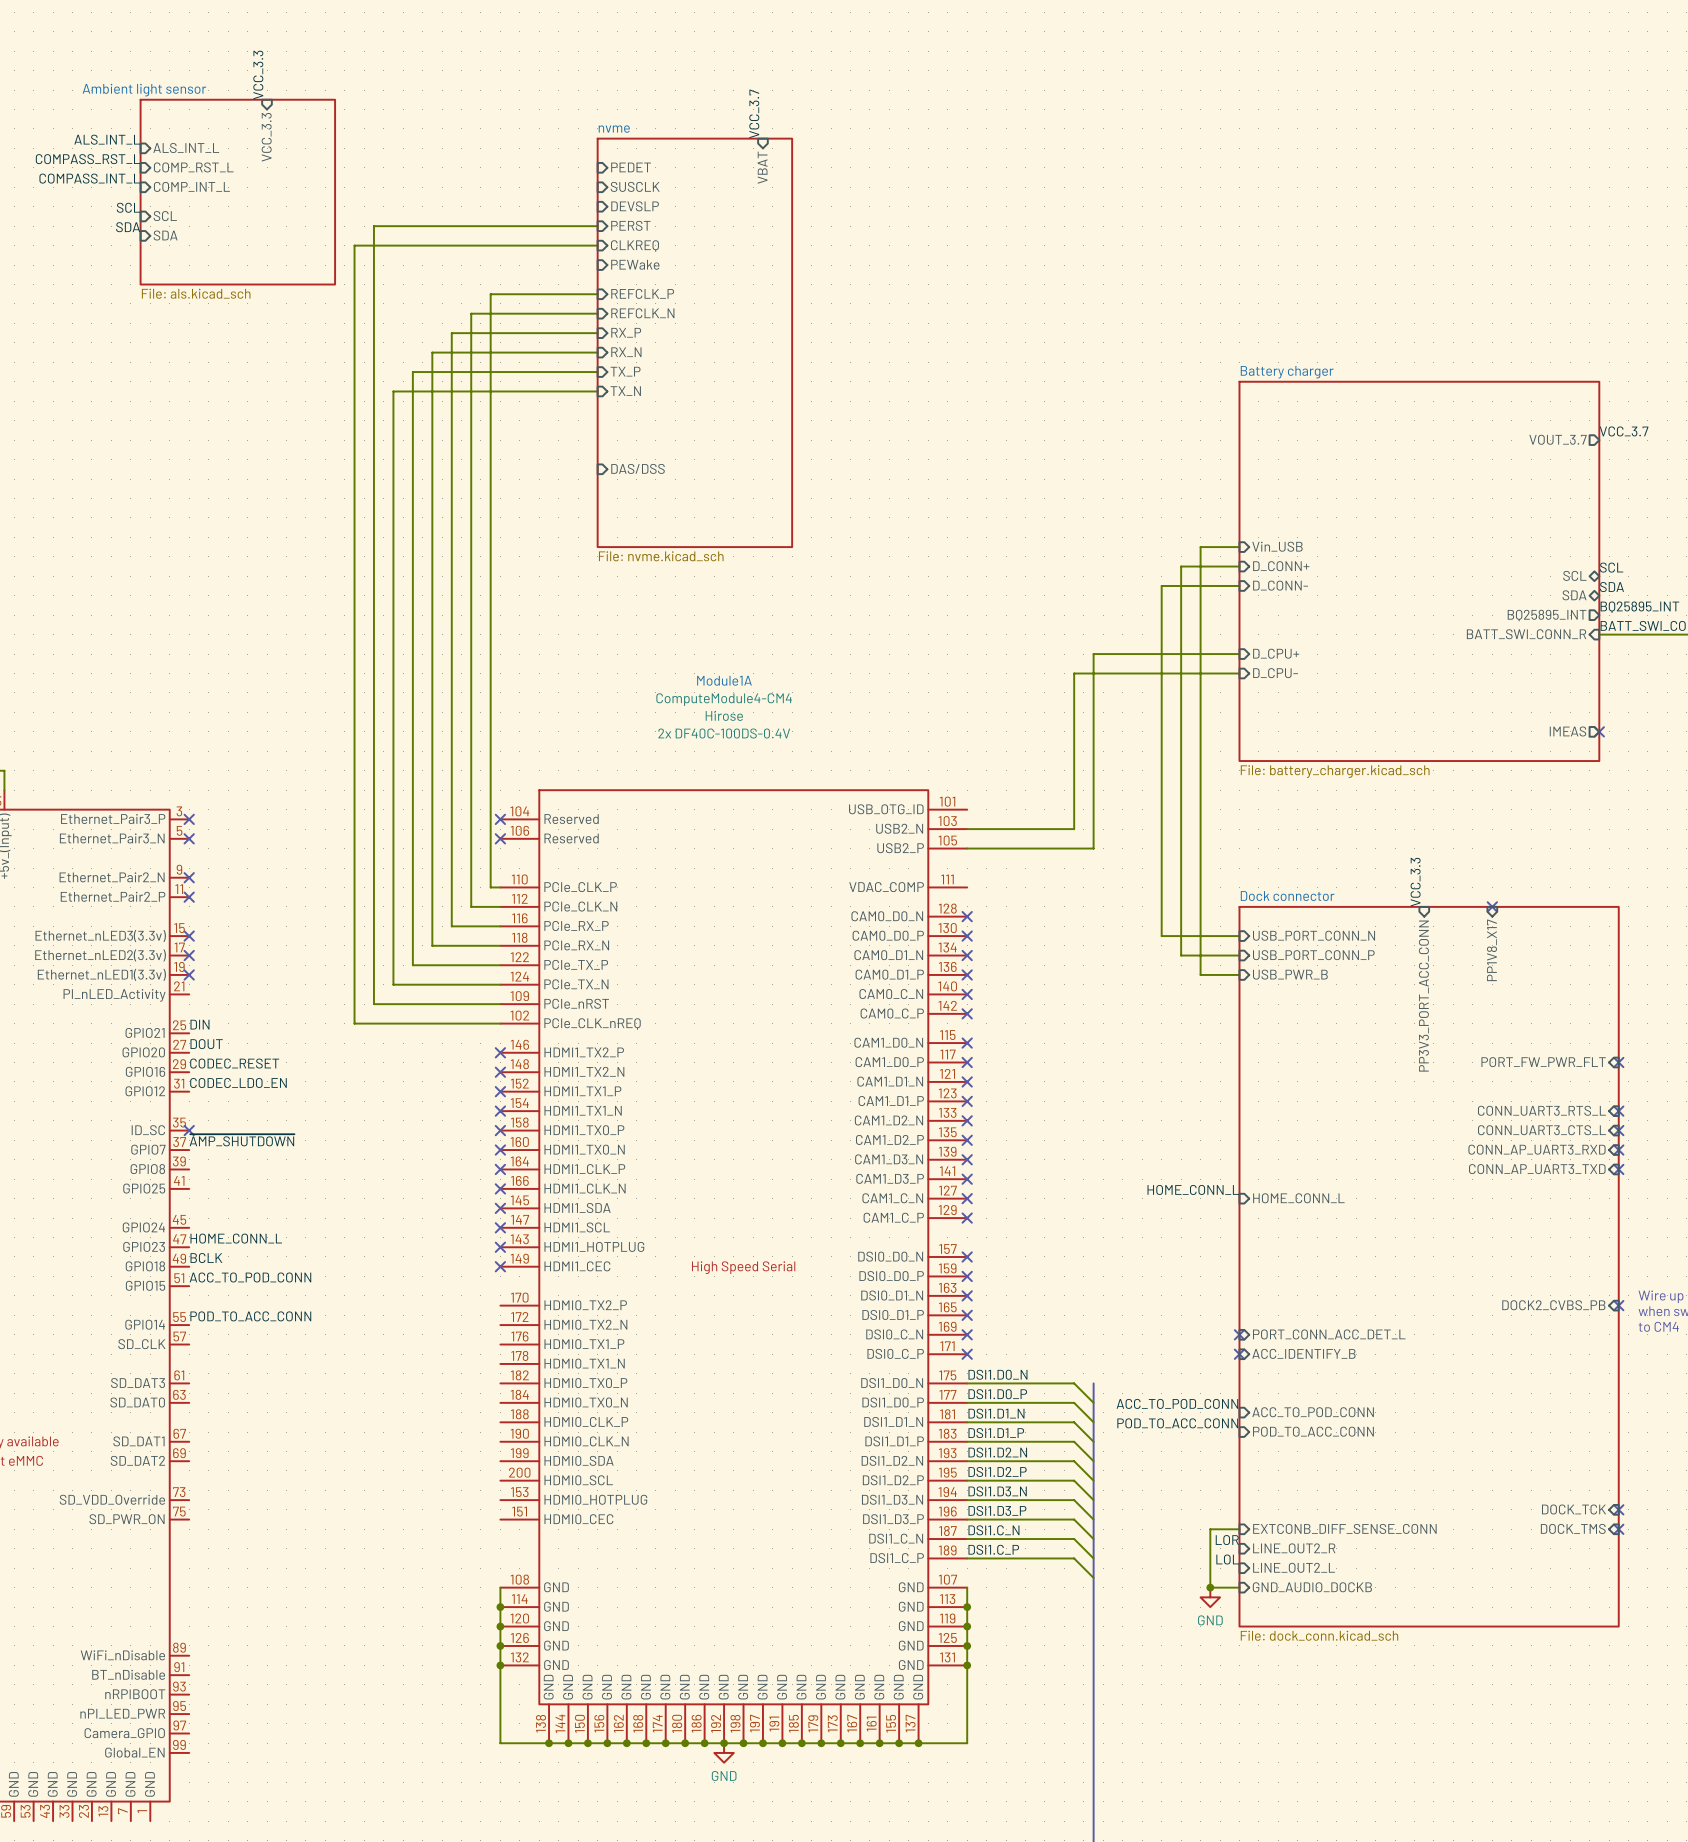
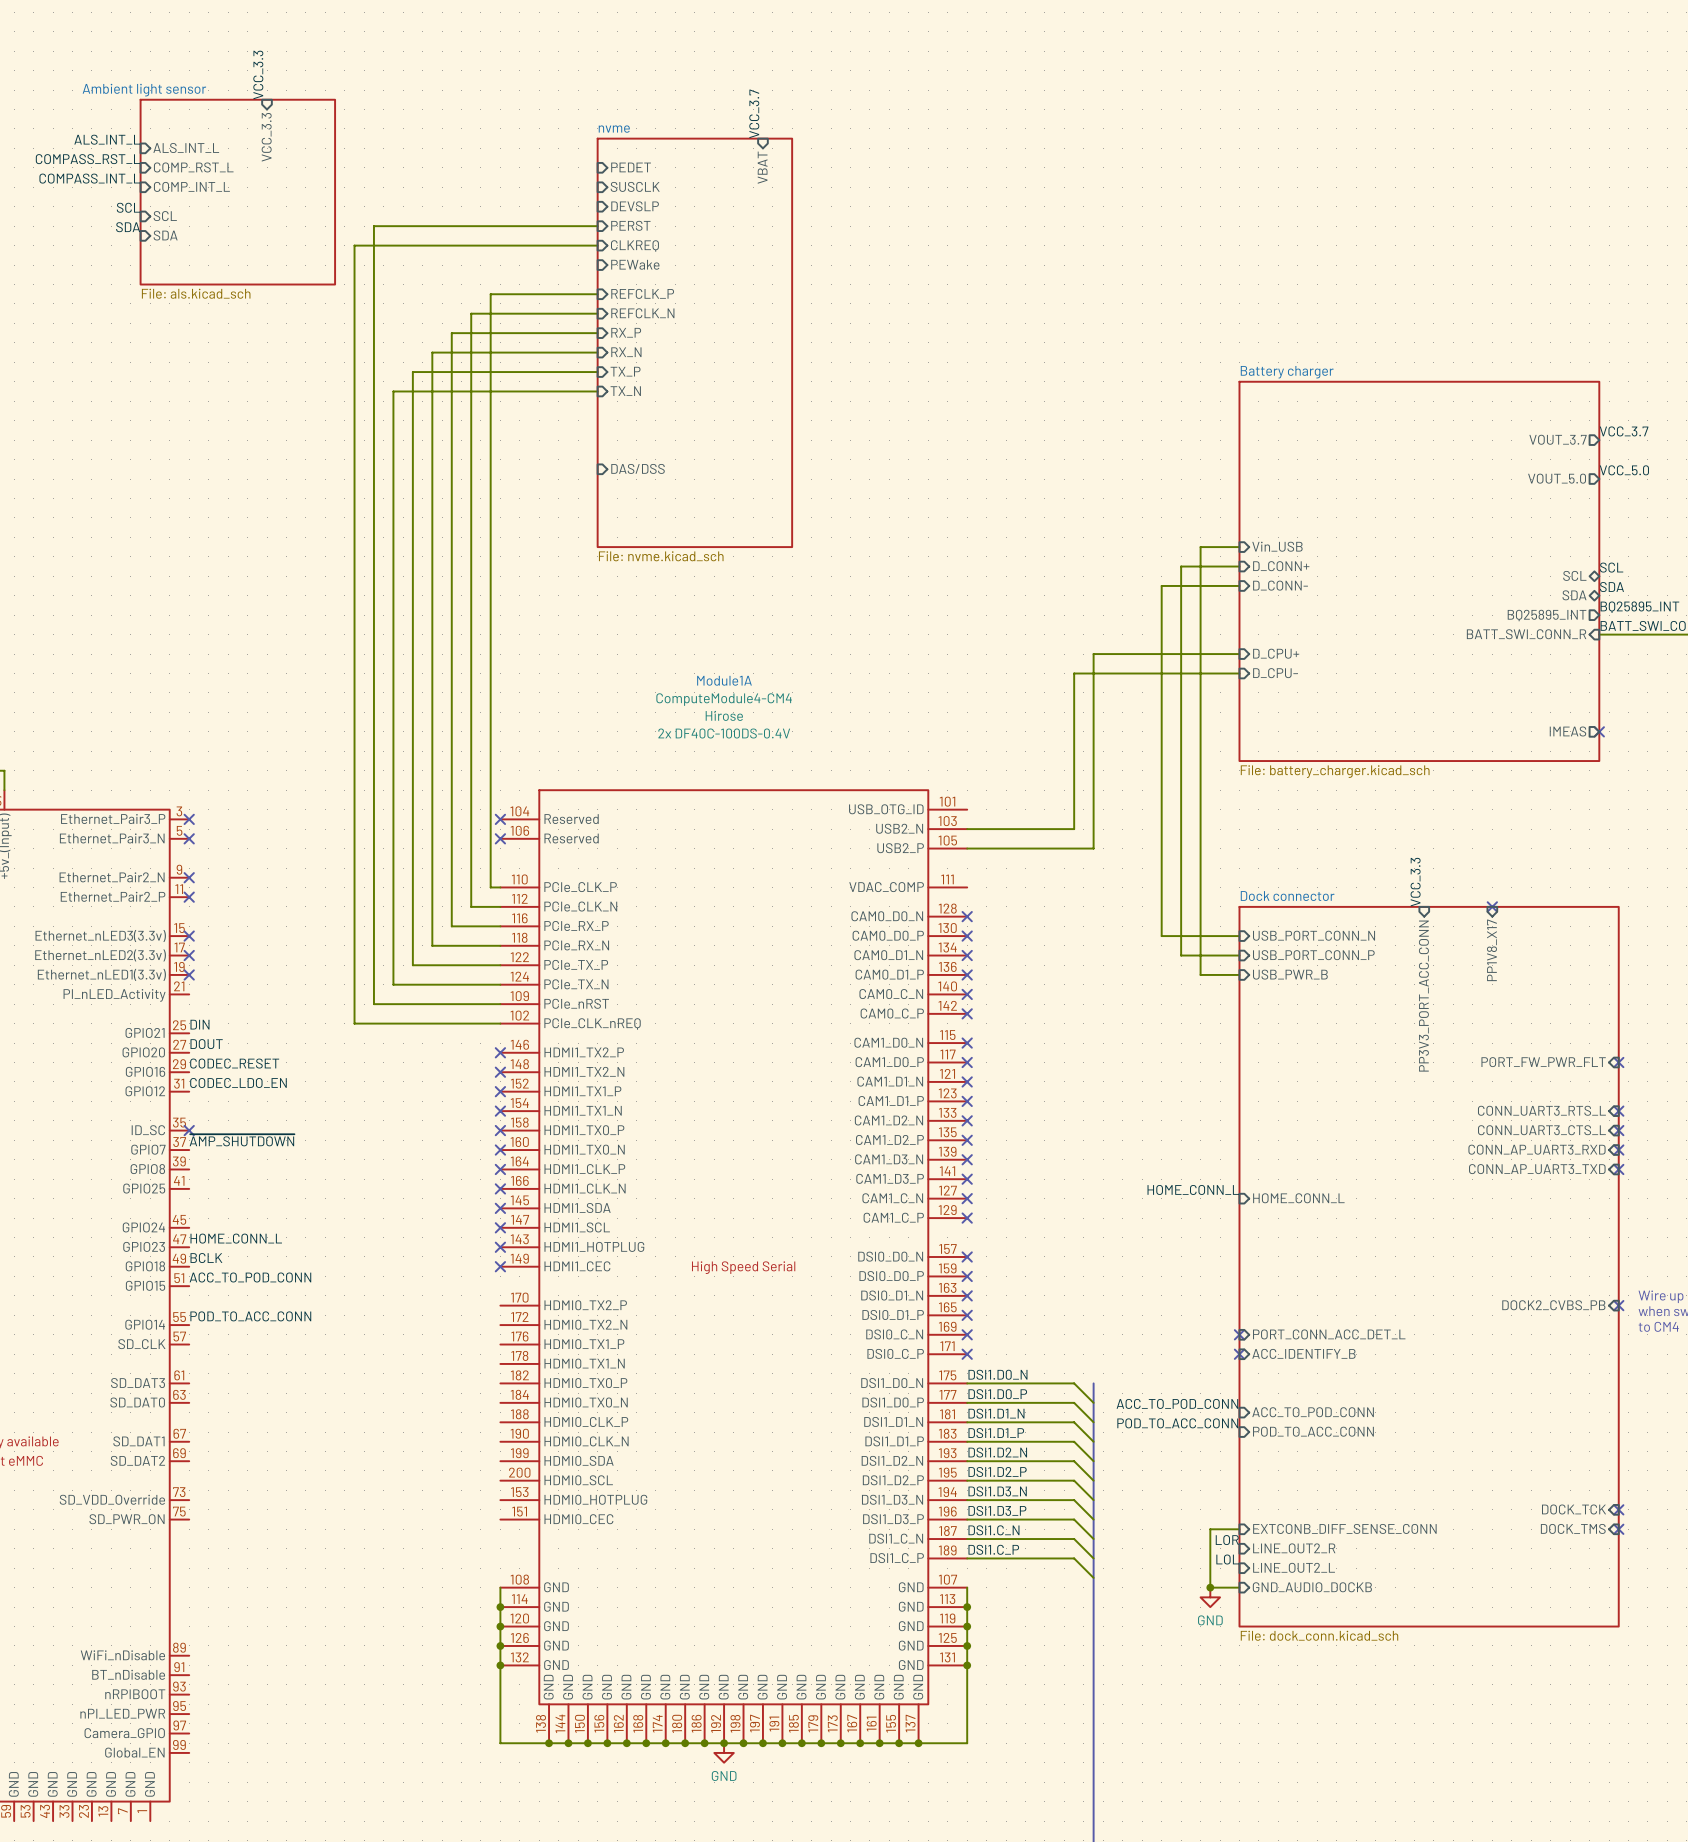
label: none -> VCC_5.0 (1624, 470)
sheet pin: none -> VOUT_5.0 (1557, 478)

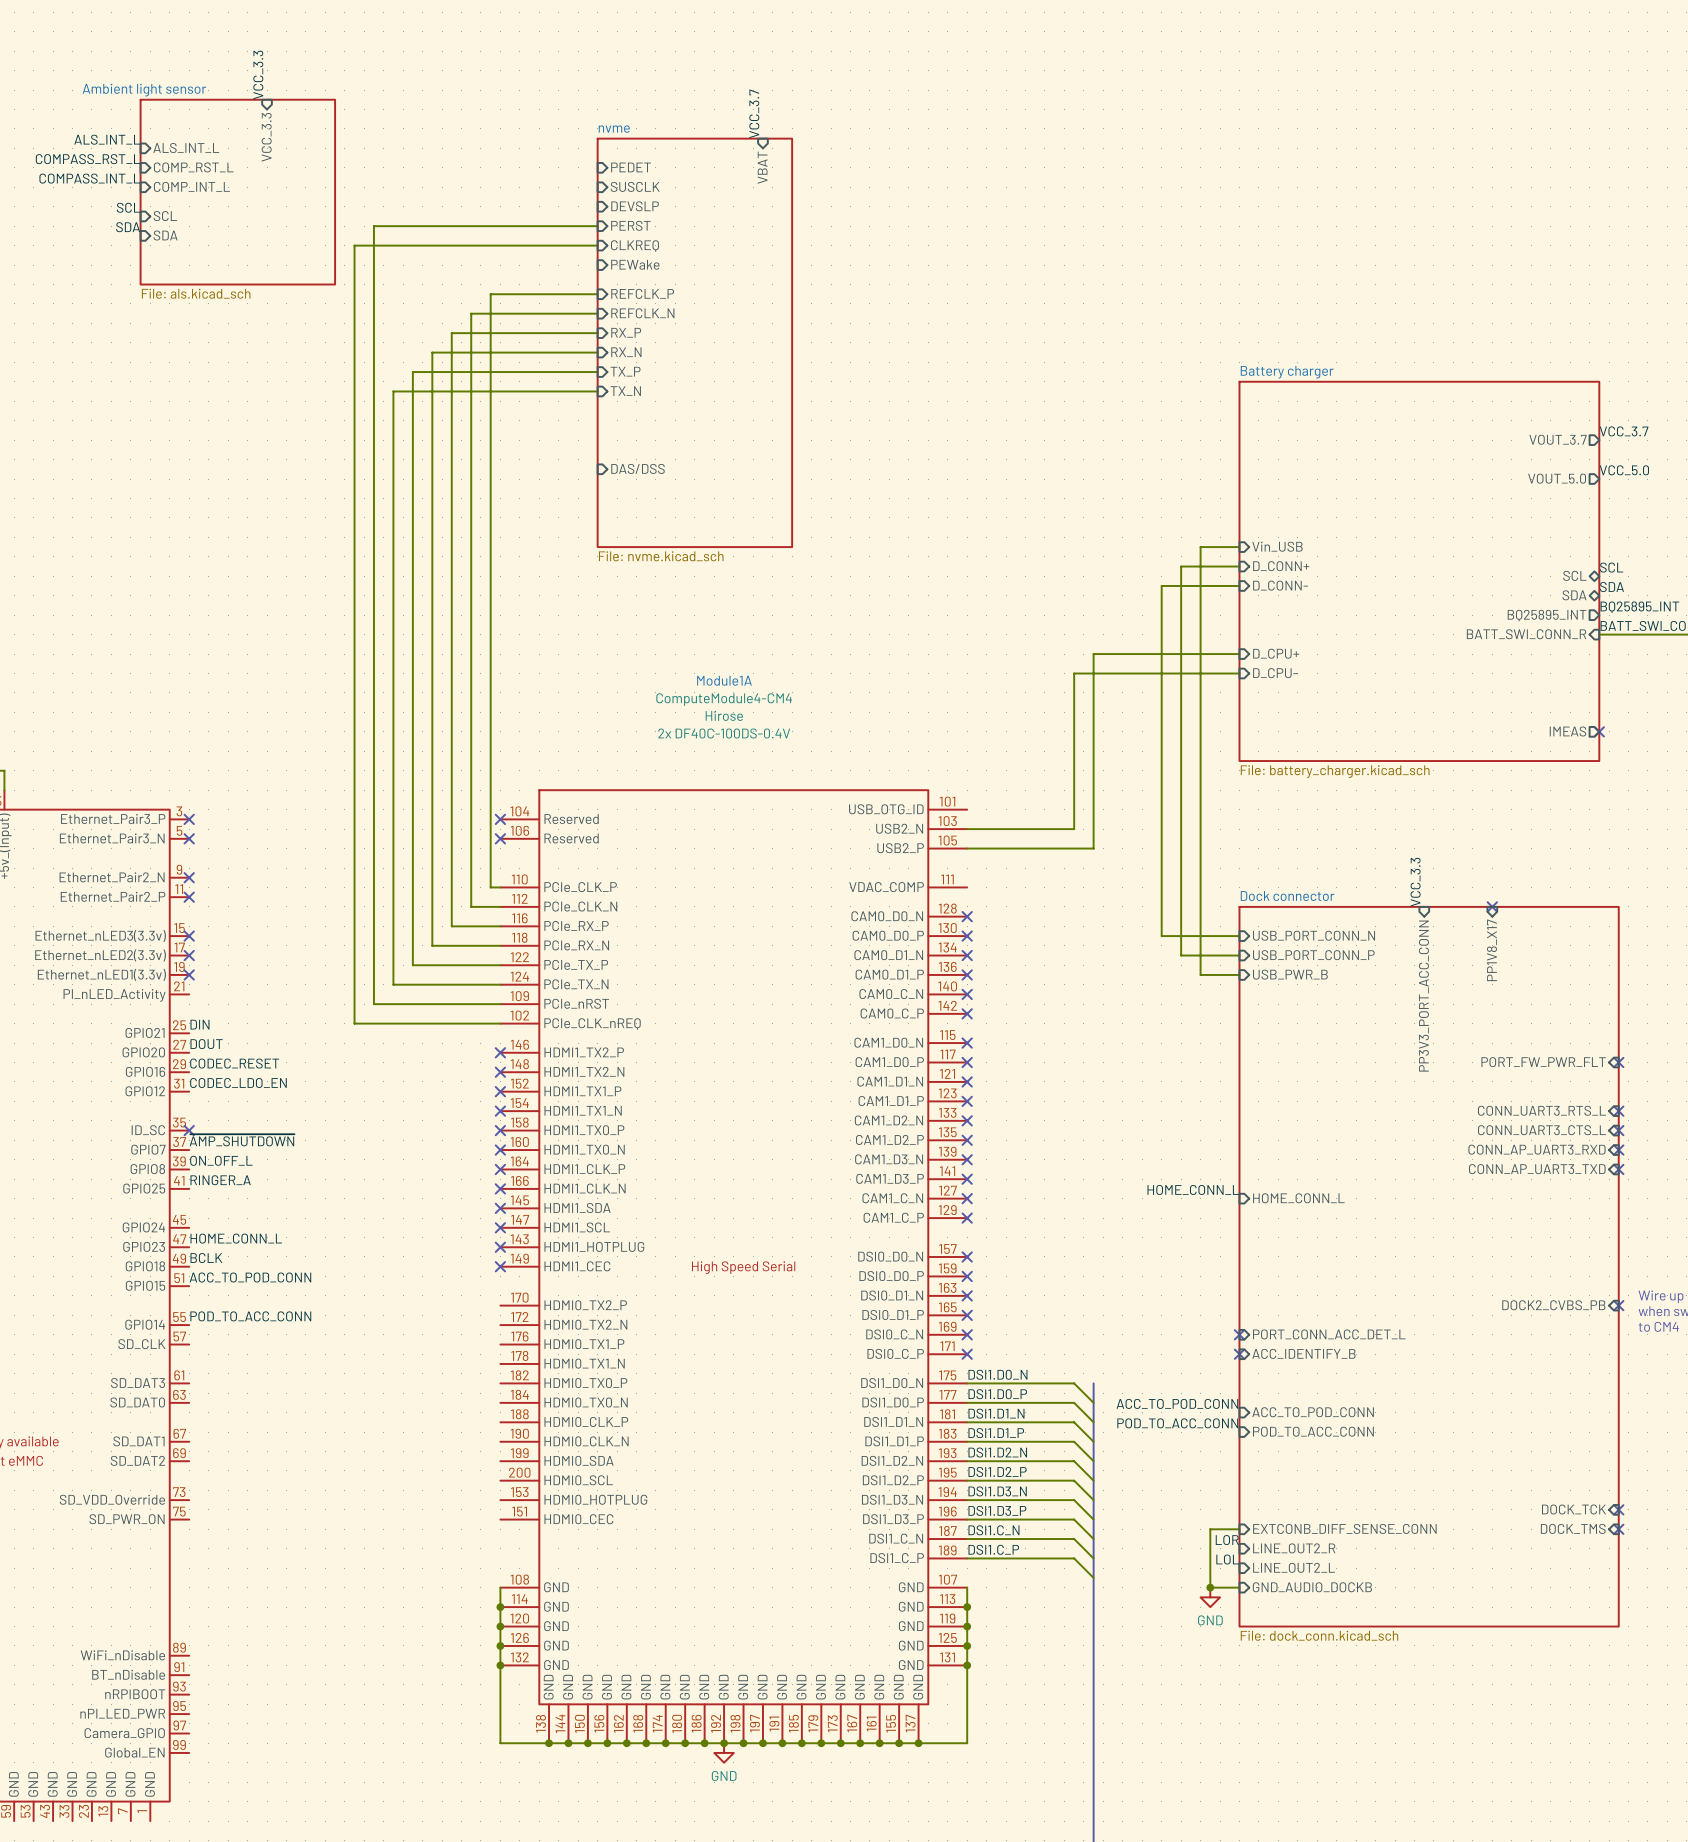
label: none -> ON_OFF_L (221, 1160)
label: none -> RINGER_A (220, 1180)

